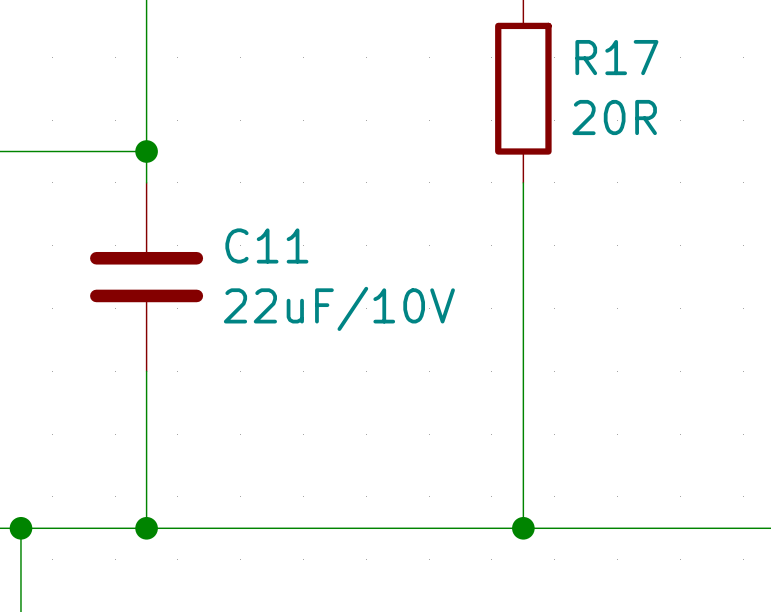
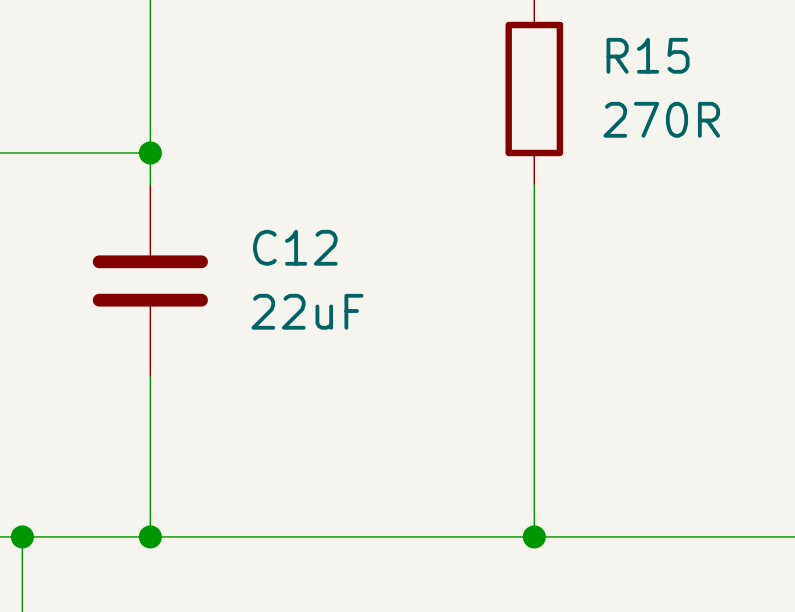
R17 name: R17 (616, 57) -> R15 (648, 55)
R17 value: 20R (614, 117) -> 270R (661, 119)
C11 name: C11 (266, 245) -> C12 (295, 247)
C11 value: 22uF/10V (339, 308) -> 22uF (307, 311)

